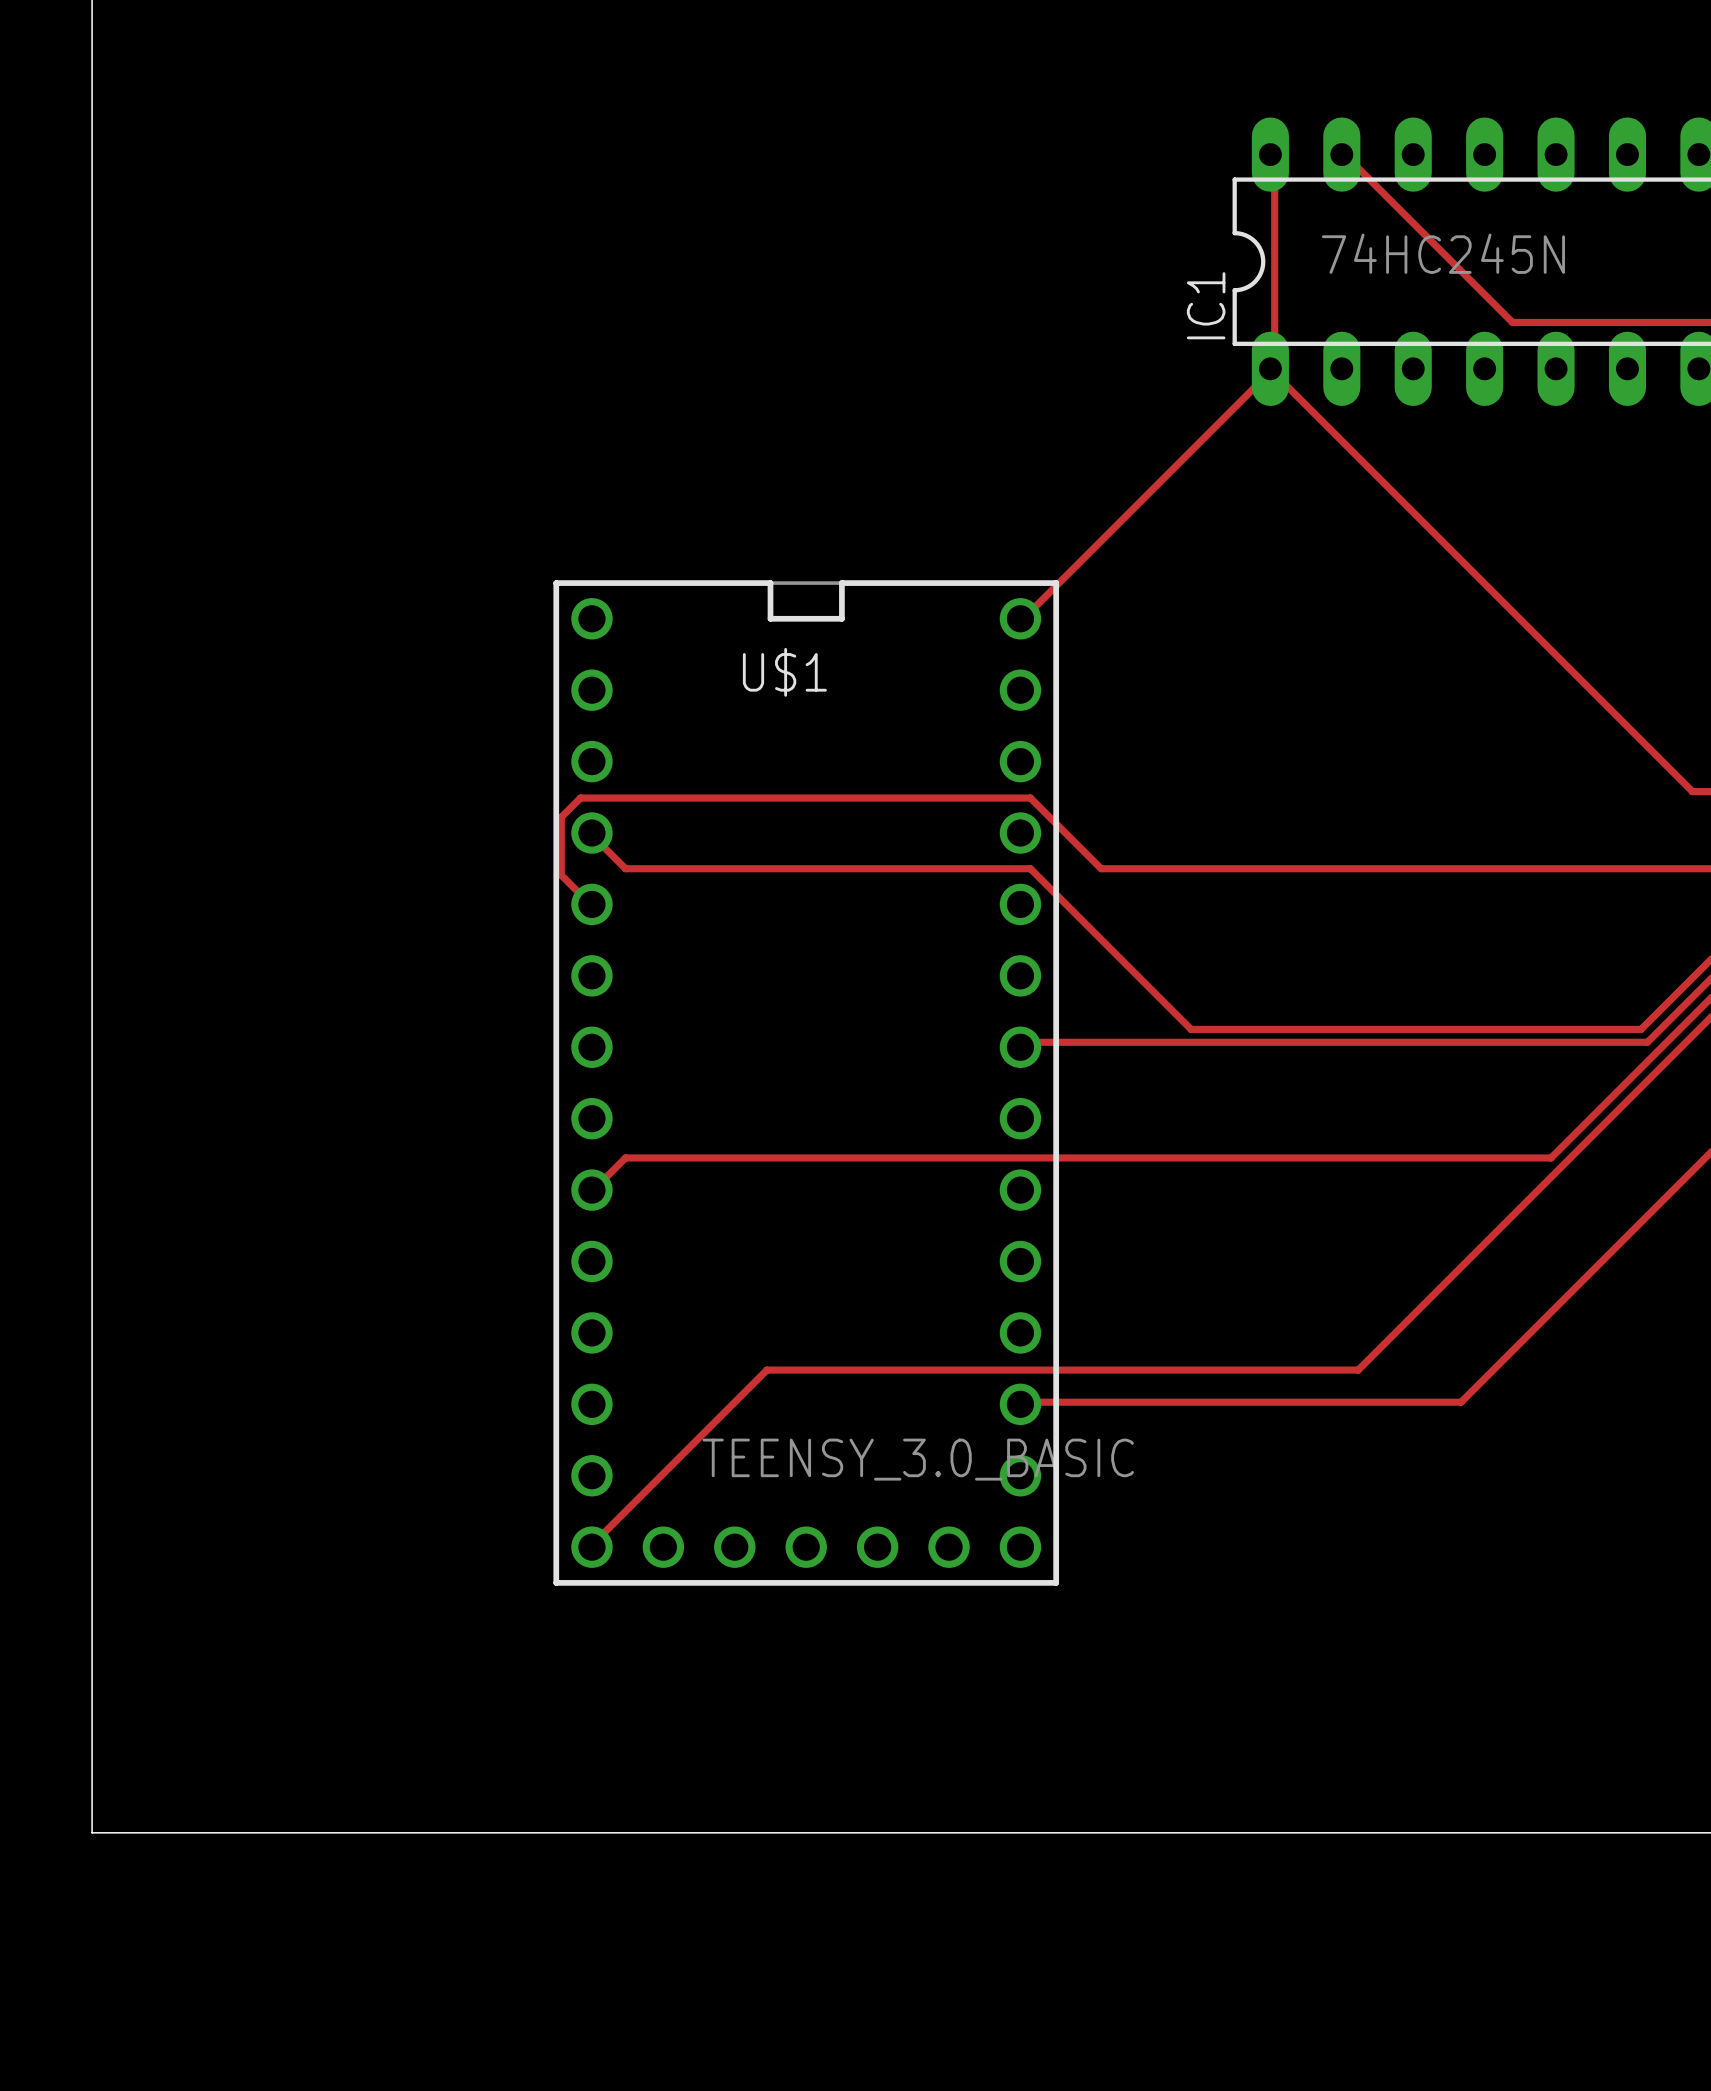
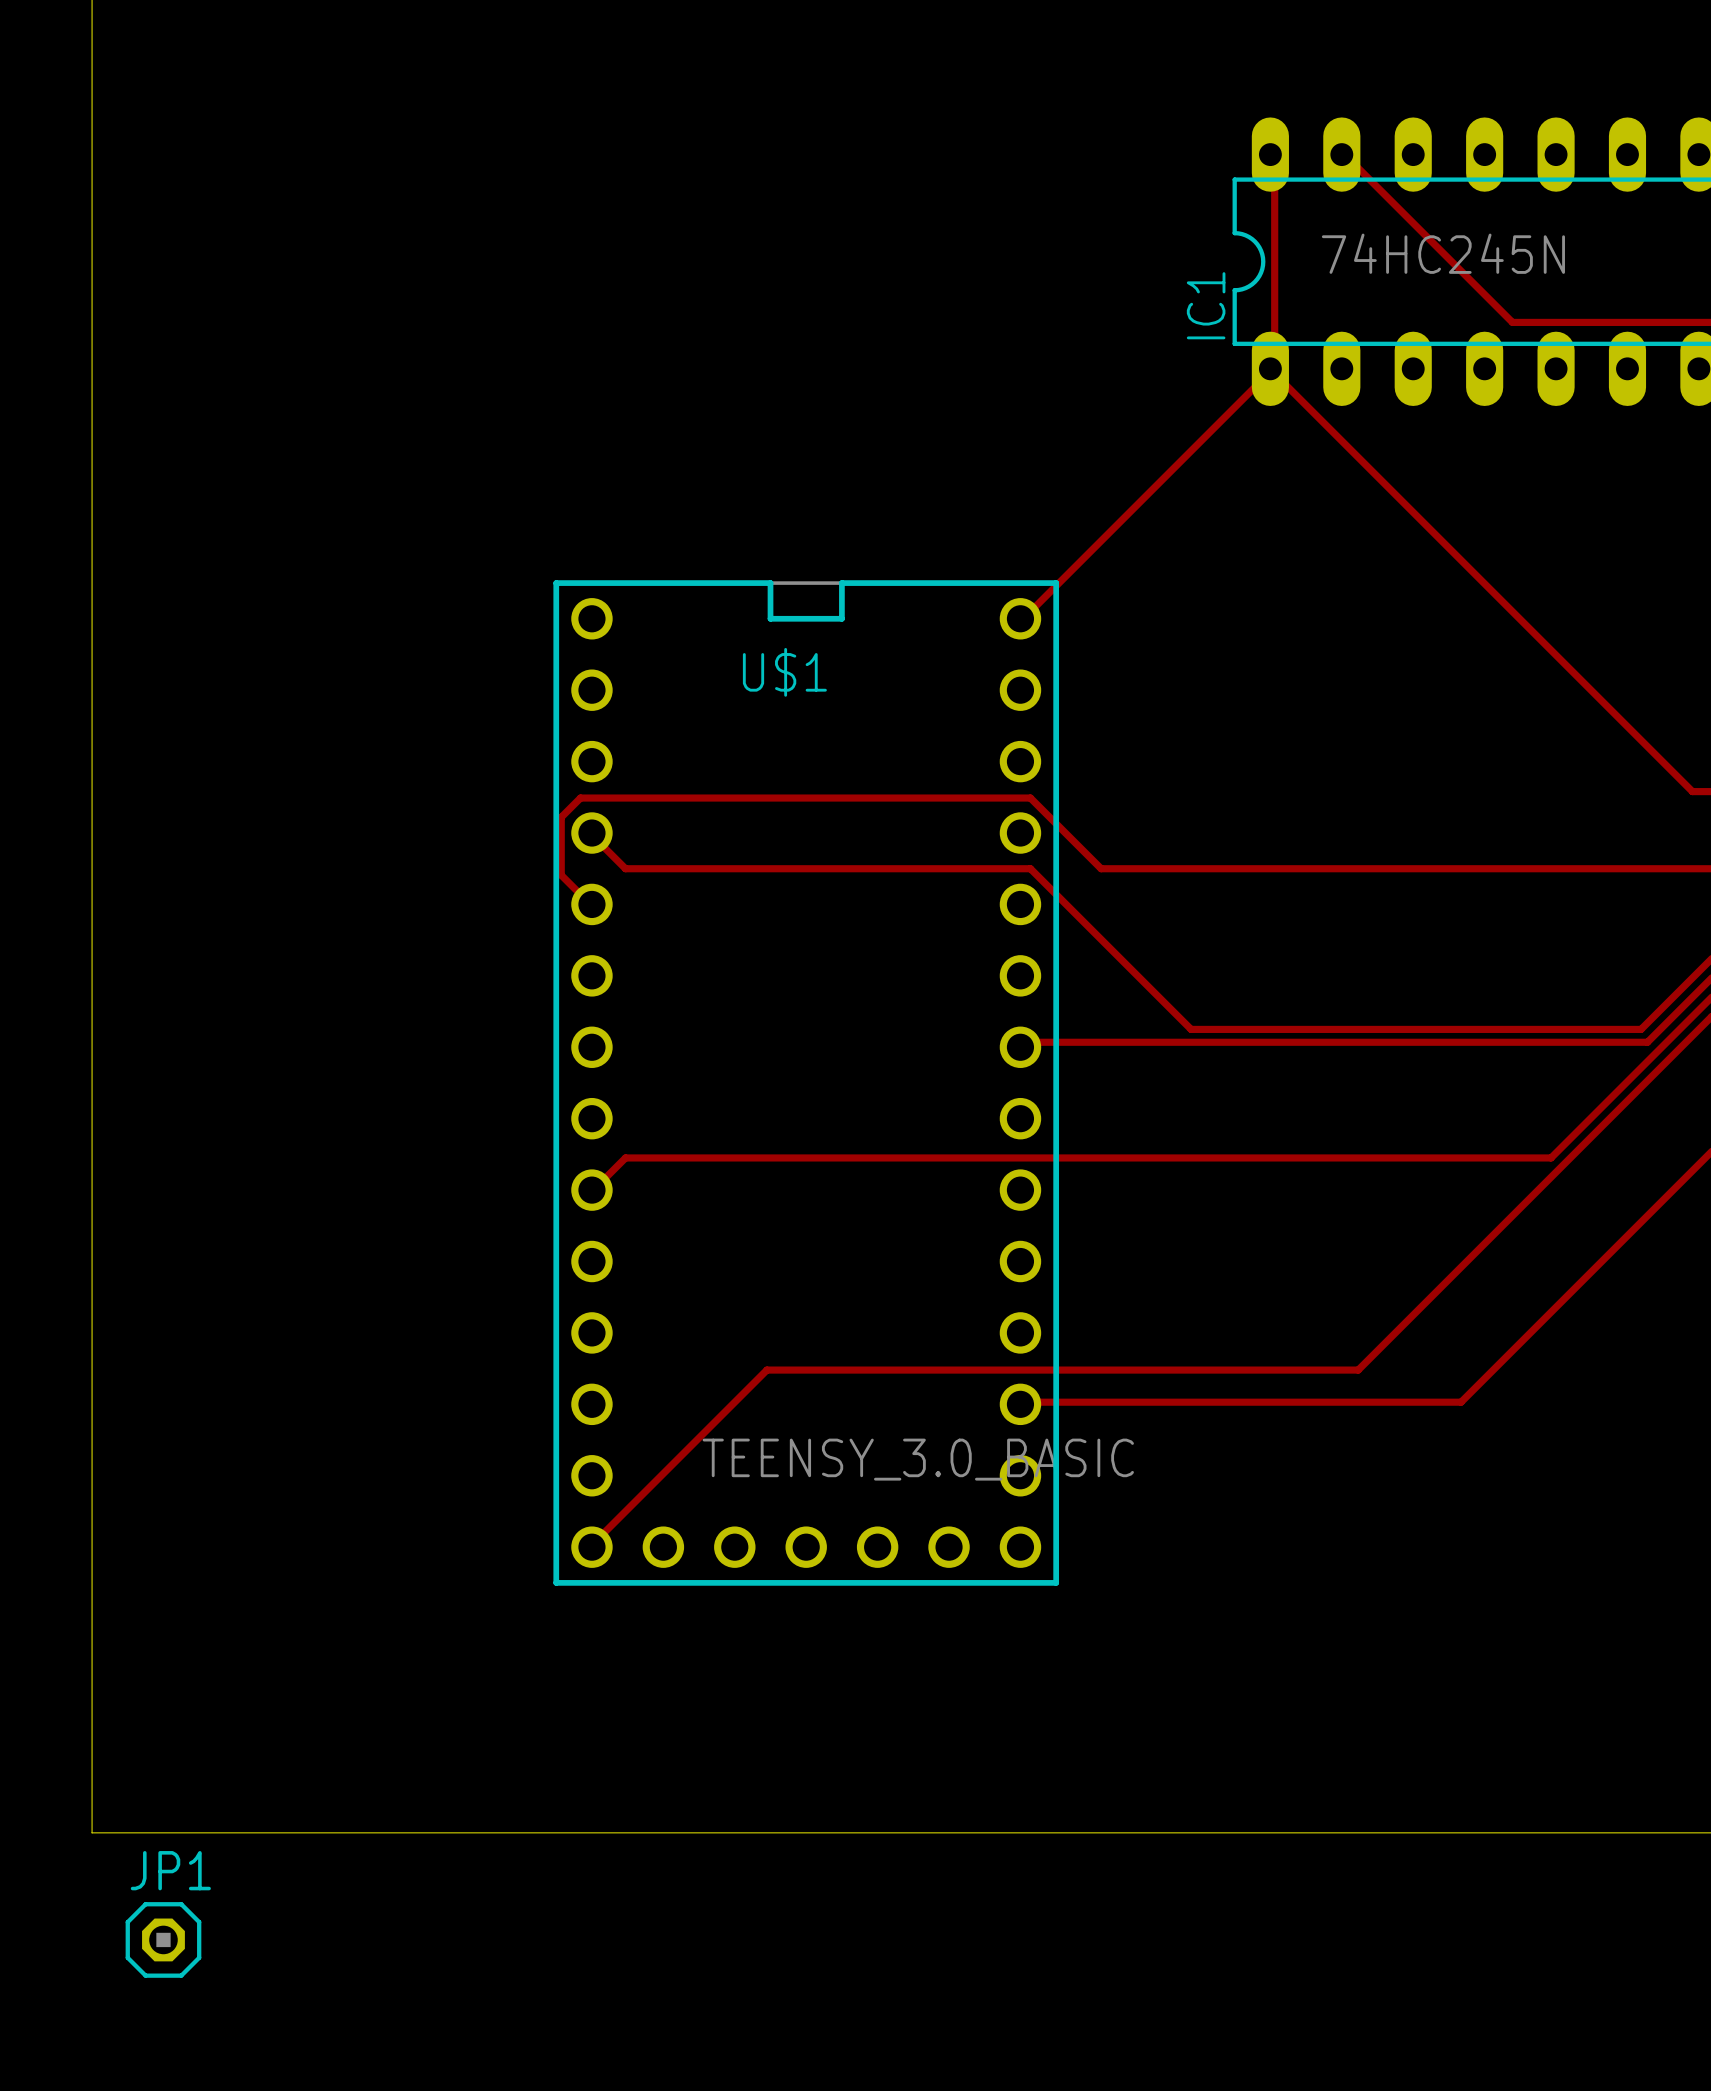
JP1: none -> (163, 1939)

